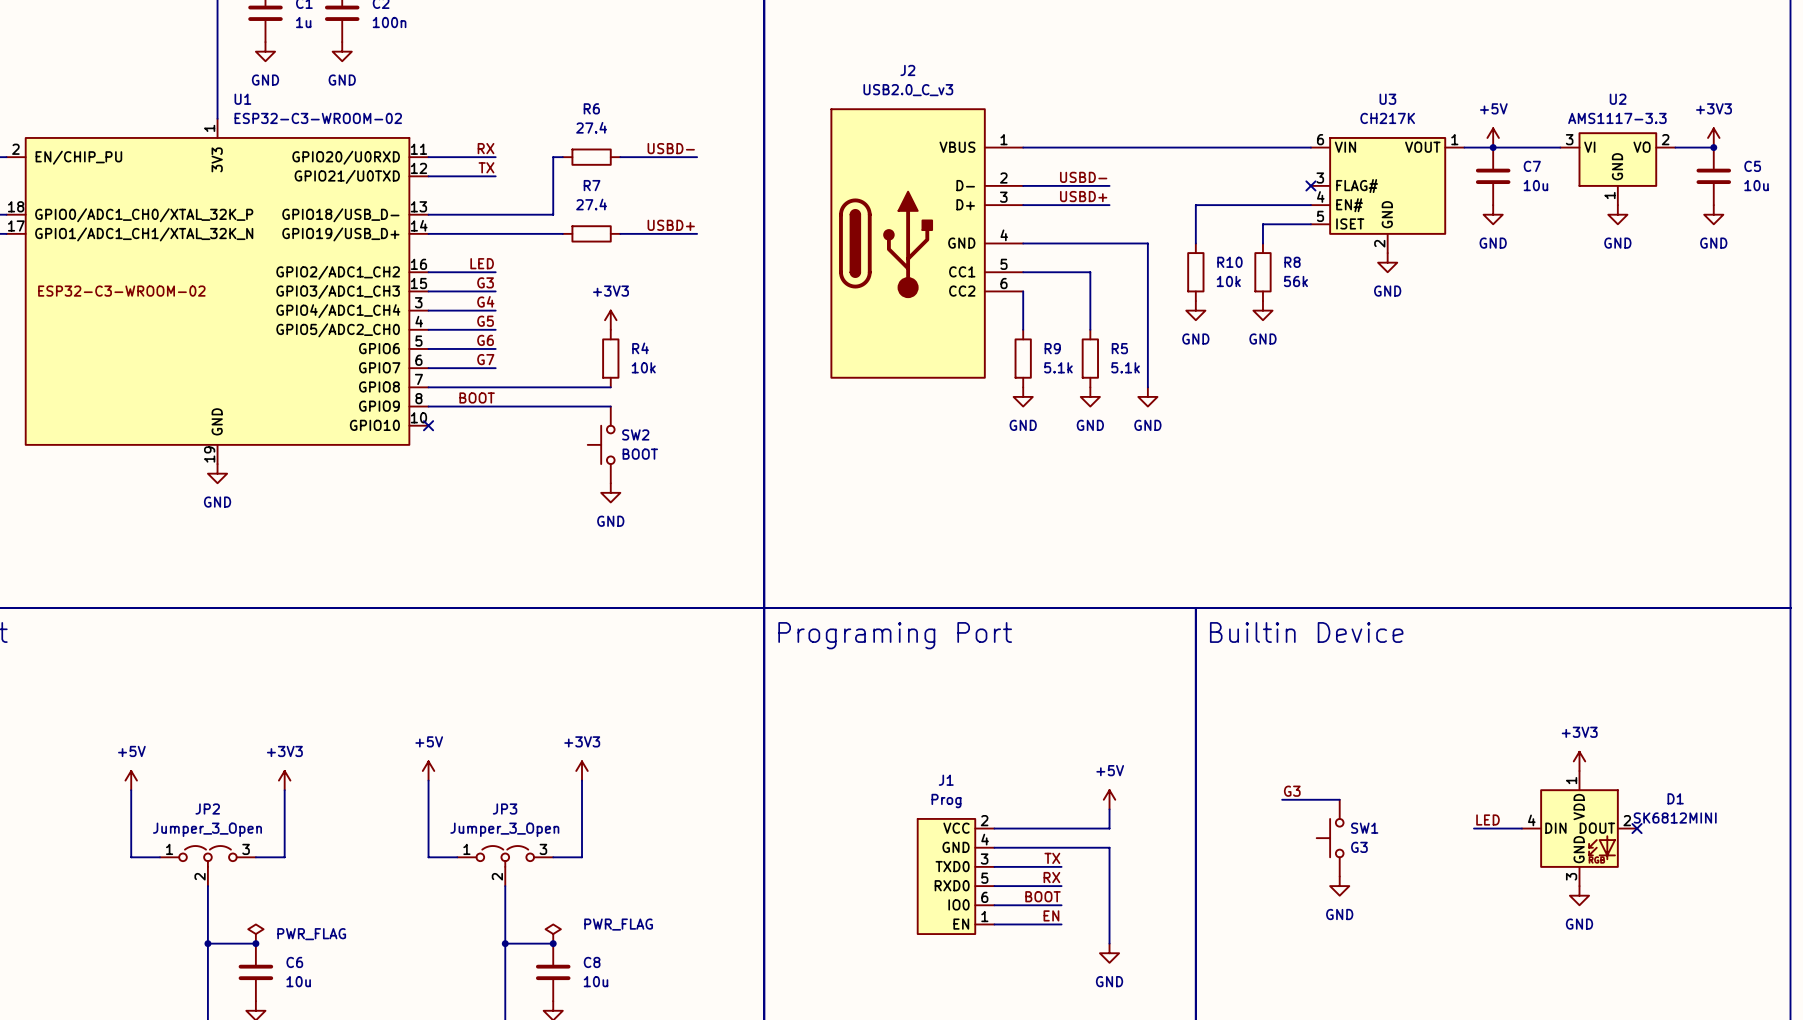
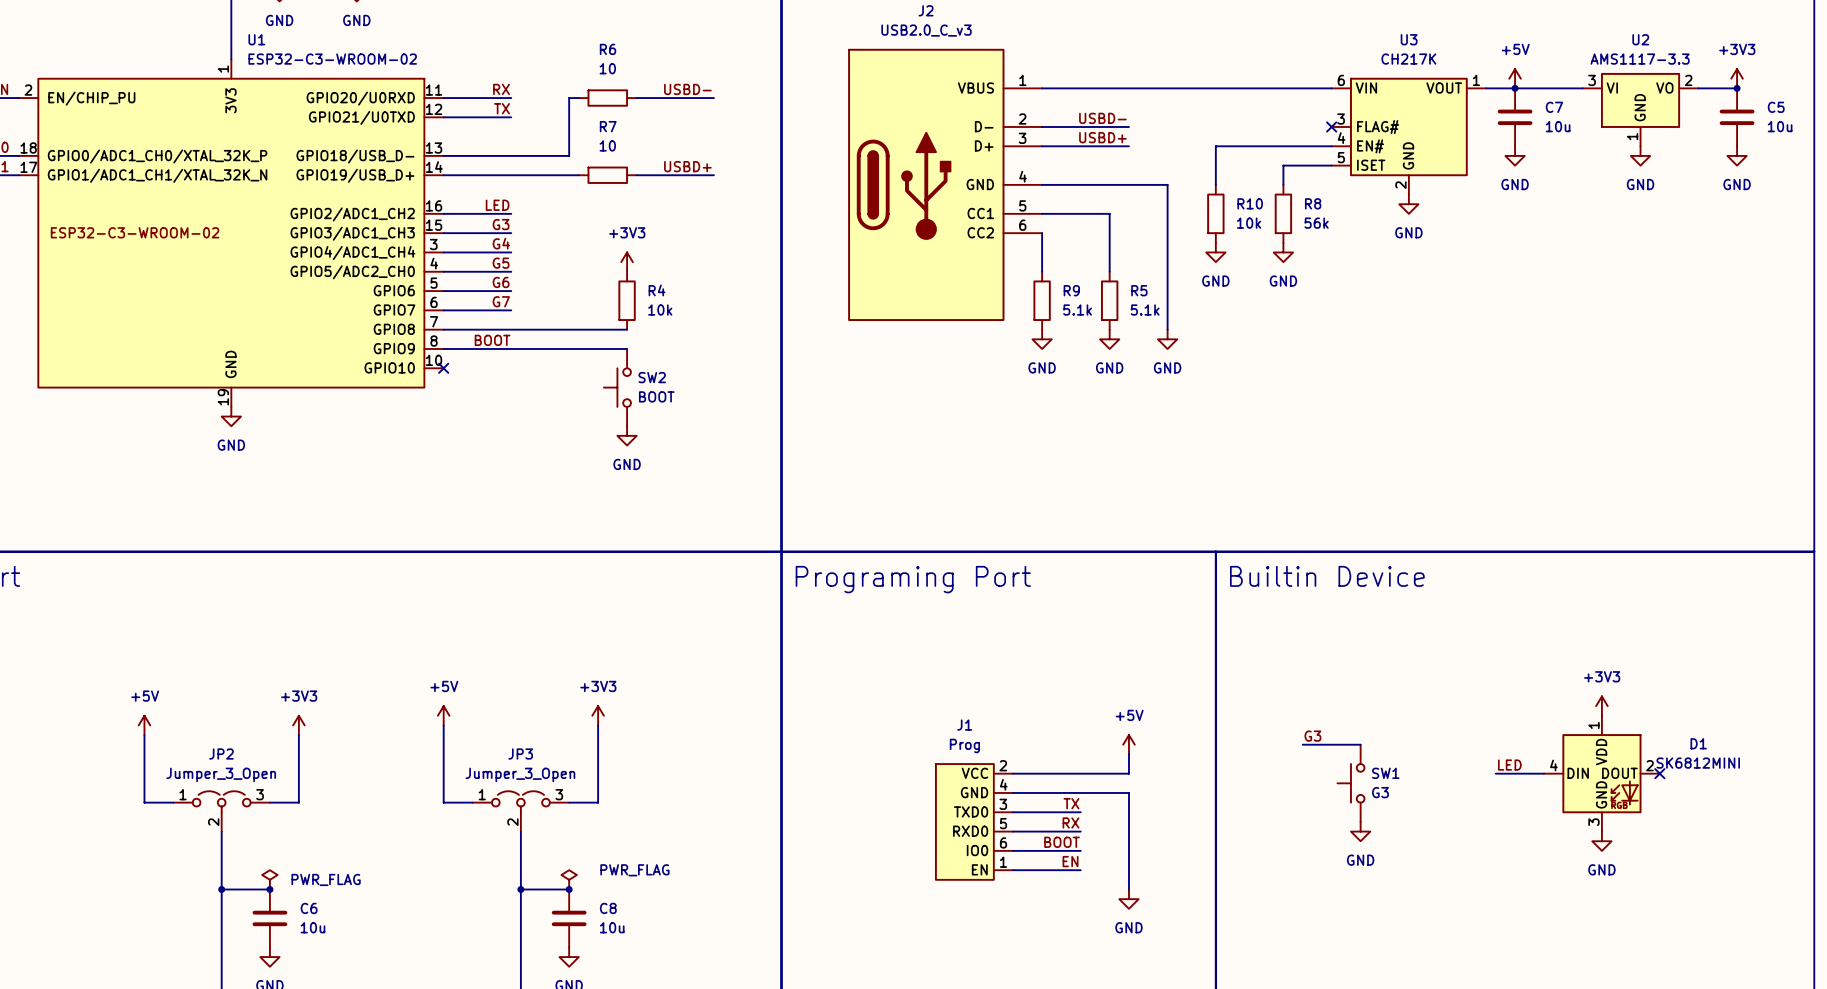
R6 value: 27.4 (591, 127) -> 10 (607, 68)
R7 value: 27.4 (591, 204) -> 10 (607, 145)

